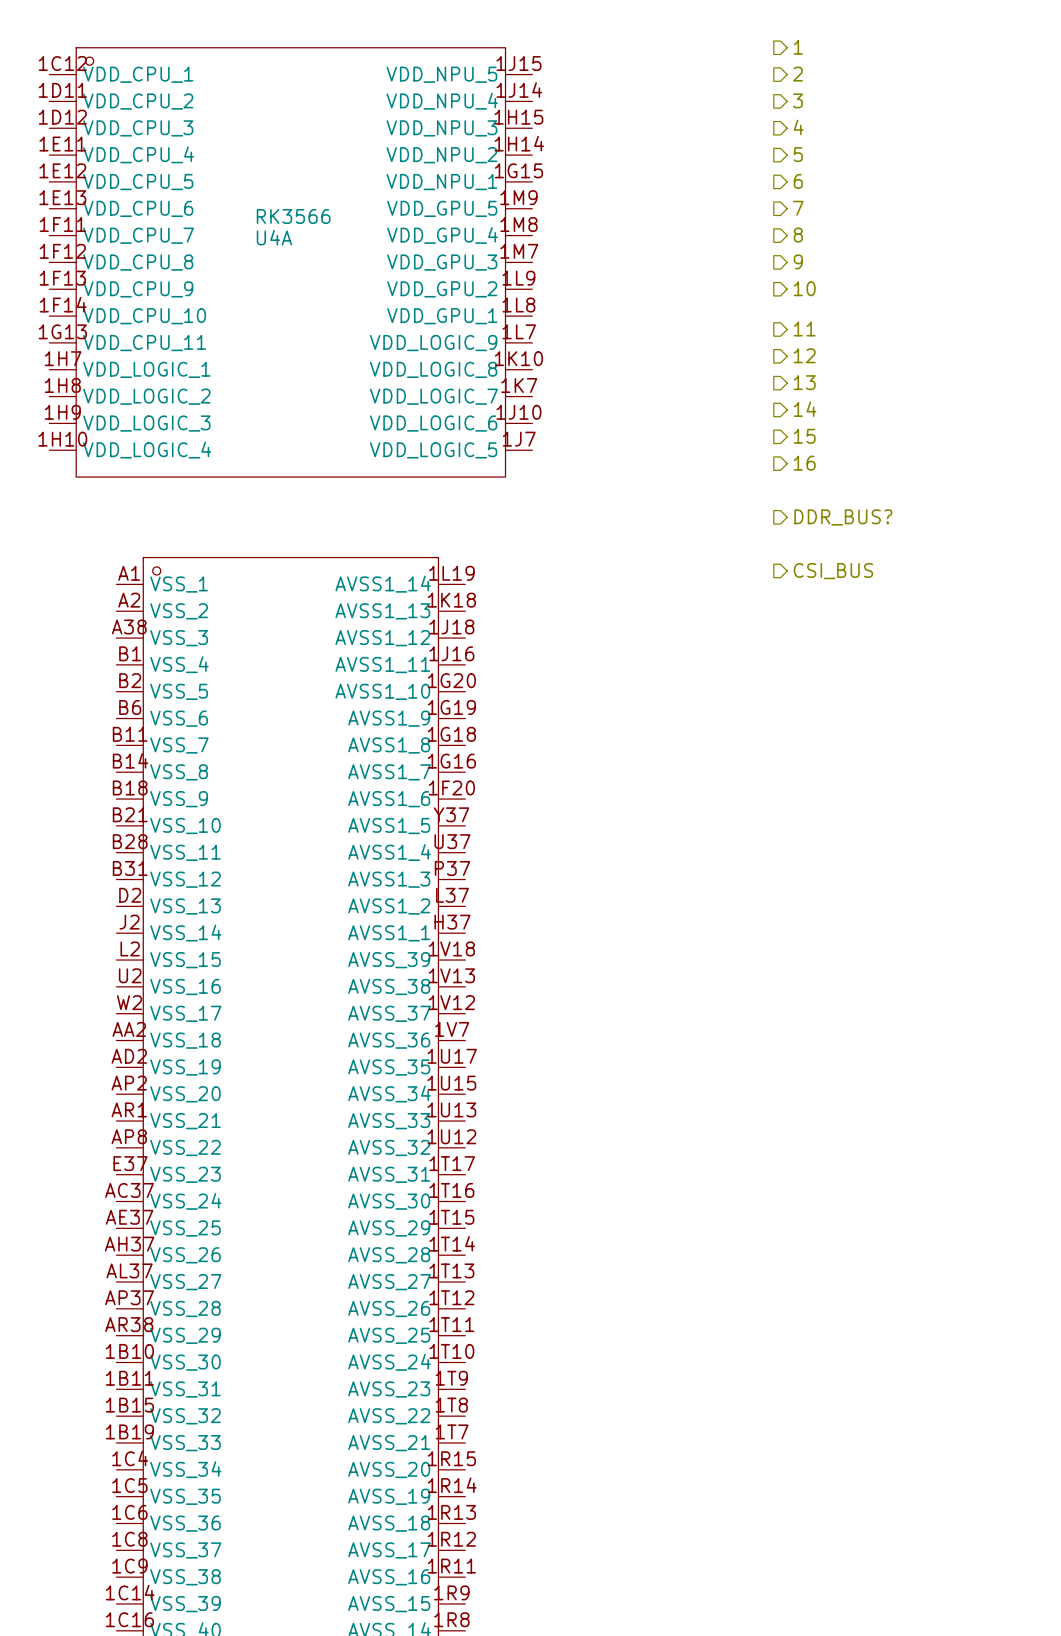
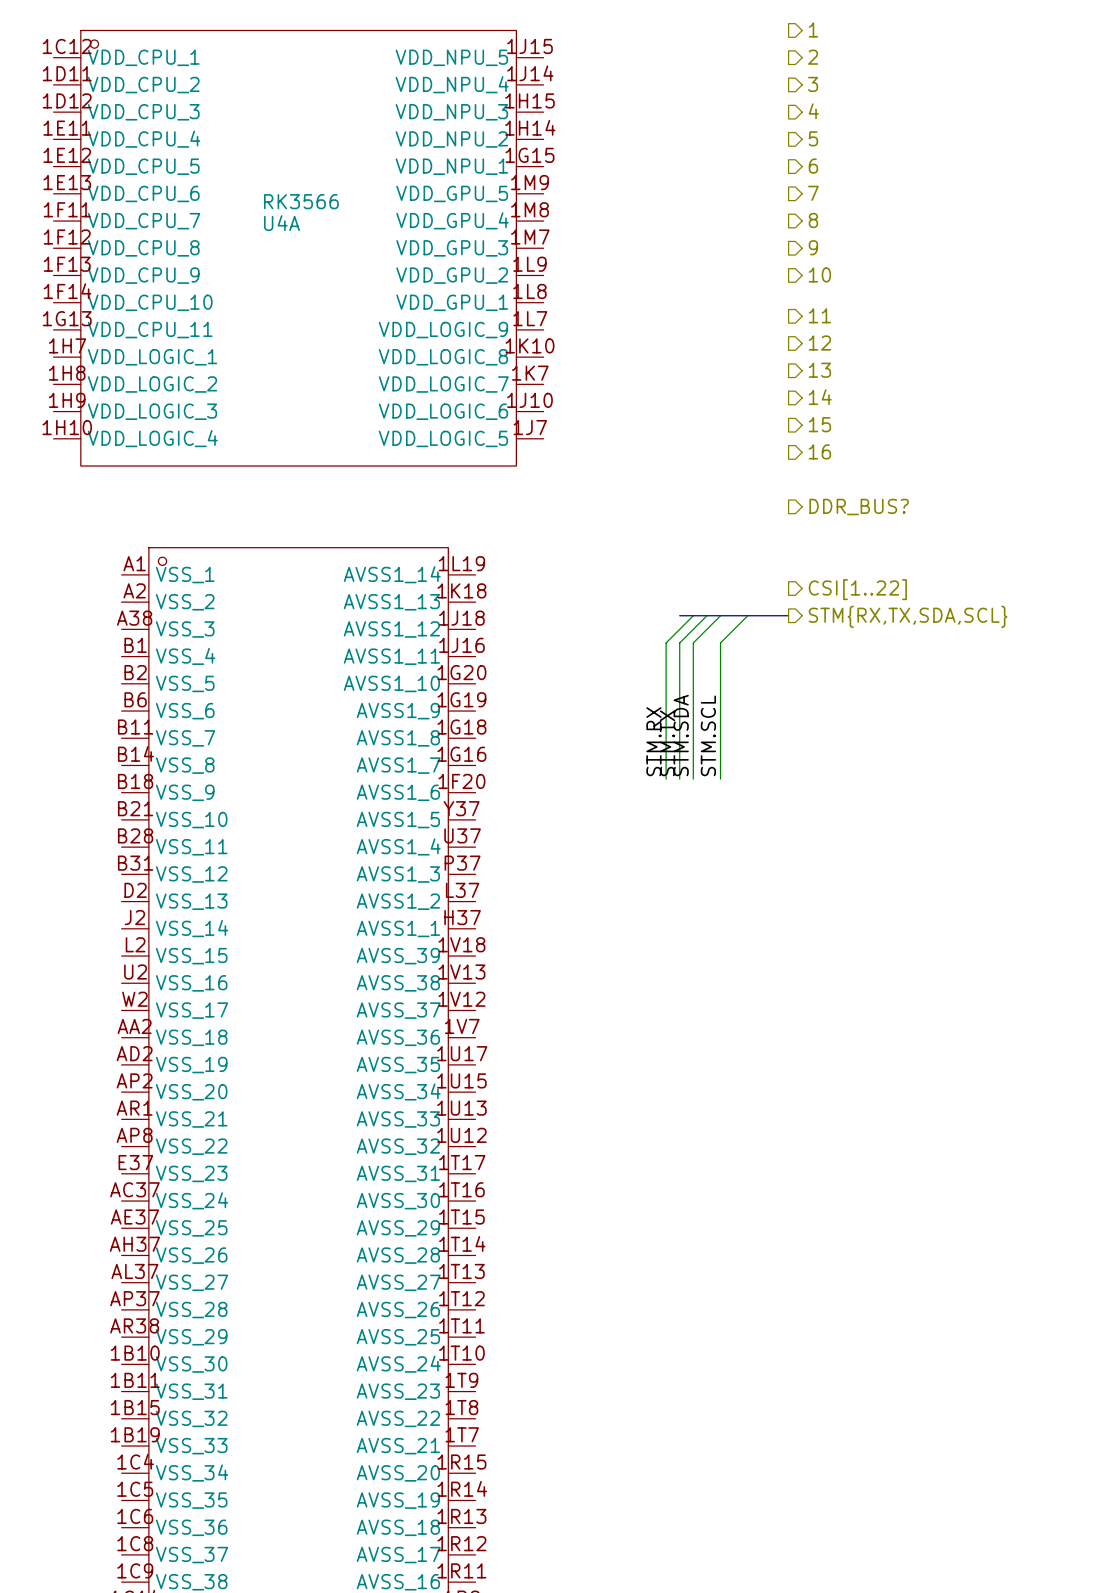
hierarchical label: CSI_BUS (833, 571) -> none
hierarchical label: none -> CSI[1..22] (857, 589)
bus: none -> (679, 615) (788, 615)
wire: none -> (693, 615) (666, 642) (666, 779)
wire: none -> (706, 615) (679, 642) (679, 779)
wire: none -> (720, 615) (693, 642) (693, 779)
wire: none -> (747, 615) (720, 642) (720, 779)
hierarchical label: none -> STM{RX,TX,SDA,SCL} (908, 616)
label: none -> STM.SDA (681, 735)
label: none -> STM.SCL (708, 735)
label: none -> STM.RX (653, 741)
label: none -> STM.TX (667, 743)

